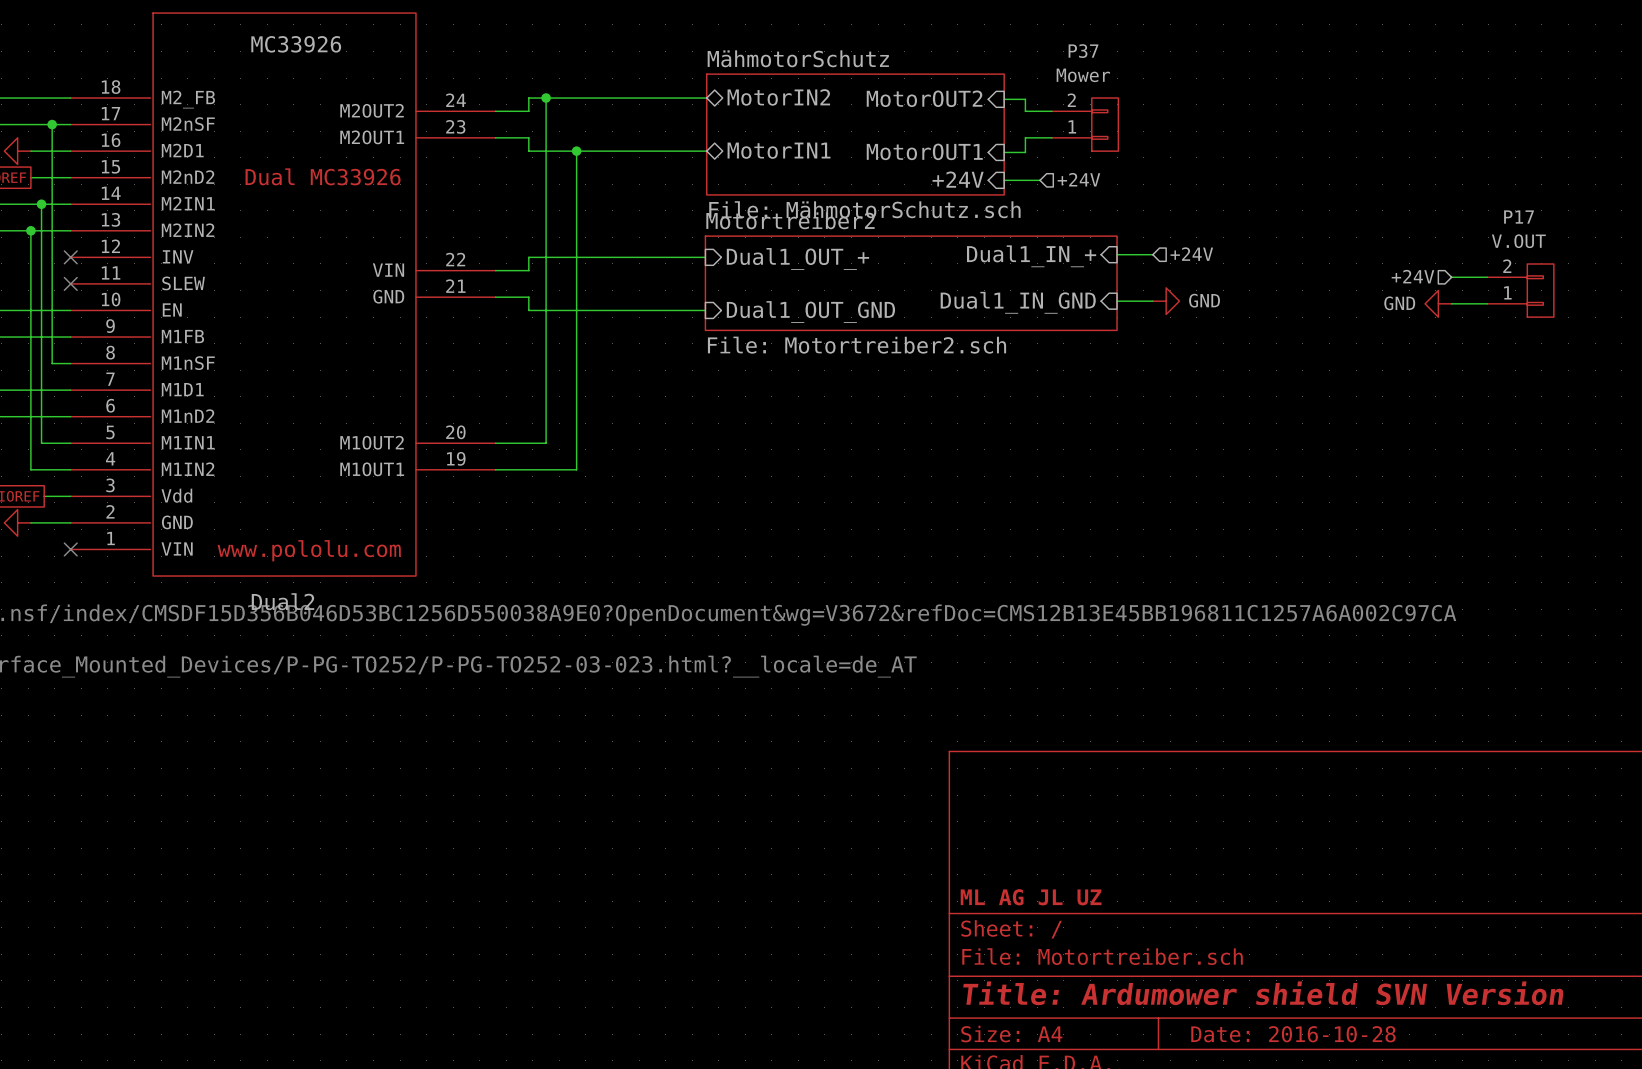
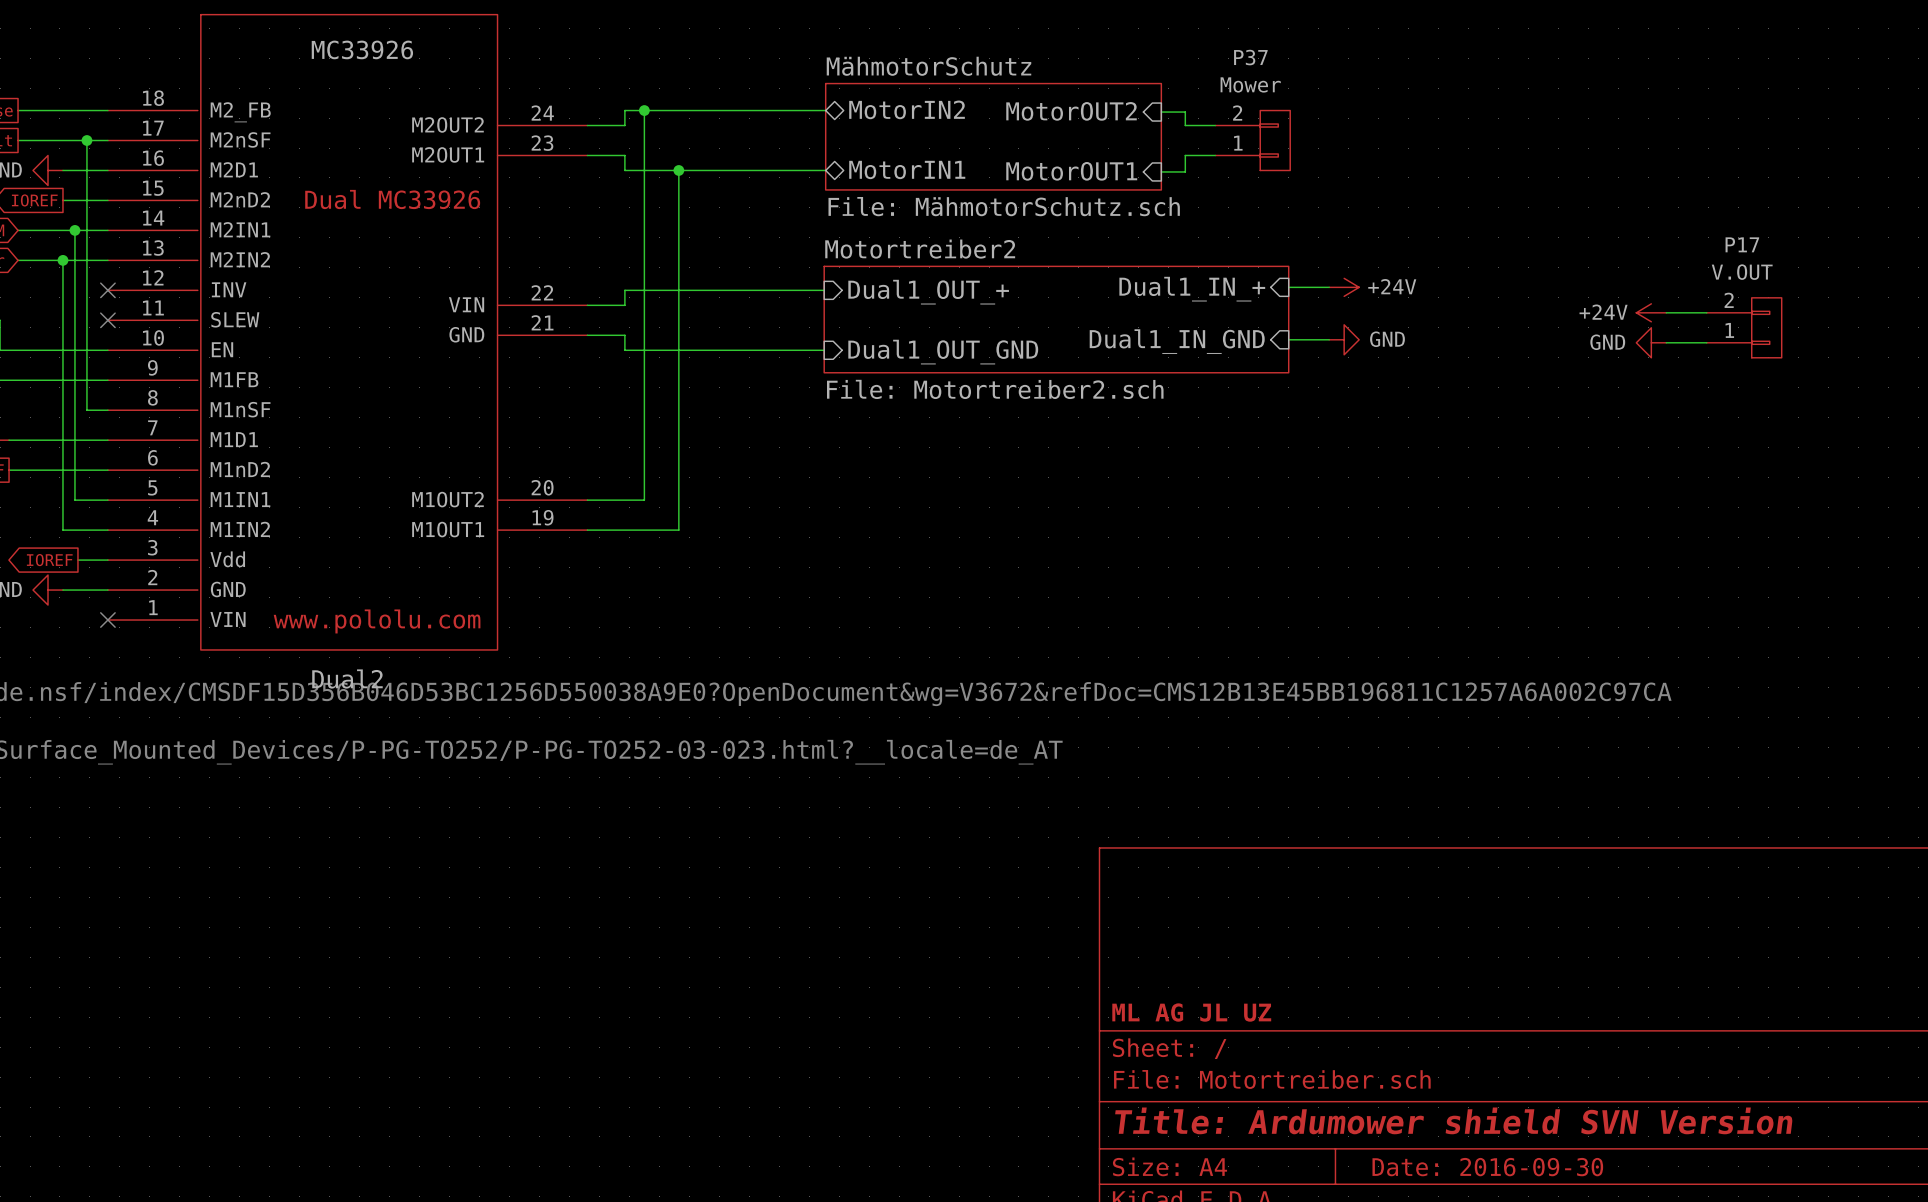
sheet MähmotorSchutz: none -> File: MähmotorSchutz.sch (993, 136)
sheet MähmotorSchutz: File: MähmotorSchutz.sch (855, 134) -> none
sheet pin: +24V (958, 179) -> none
hierarchical label: +24V (1078, 179) -> none
wire: (1004, 180) (1040, 180) -> none
power symbol: none -> +24V (1344, 287)
hierarchical label: +24V (1191, 254) -> none
hierarchical label: +24V (1412, 276) -> none
power symbol: none -> +24V (1651, 312)
title block: Date: 2016-10-28 (1293, 1034) -> Date: 2016-09-30 (1487, 1167)

